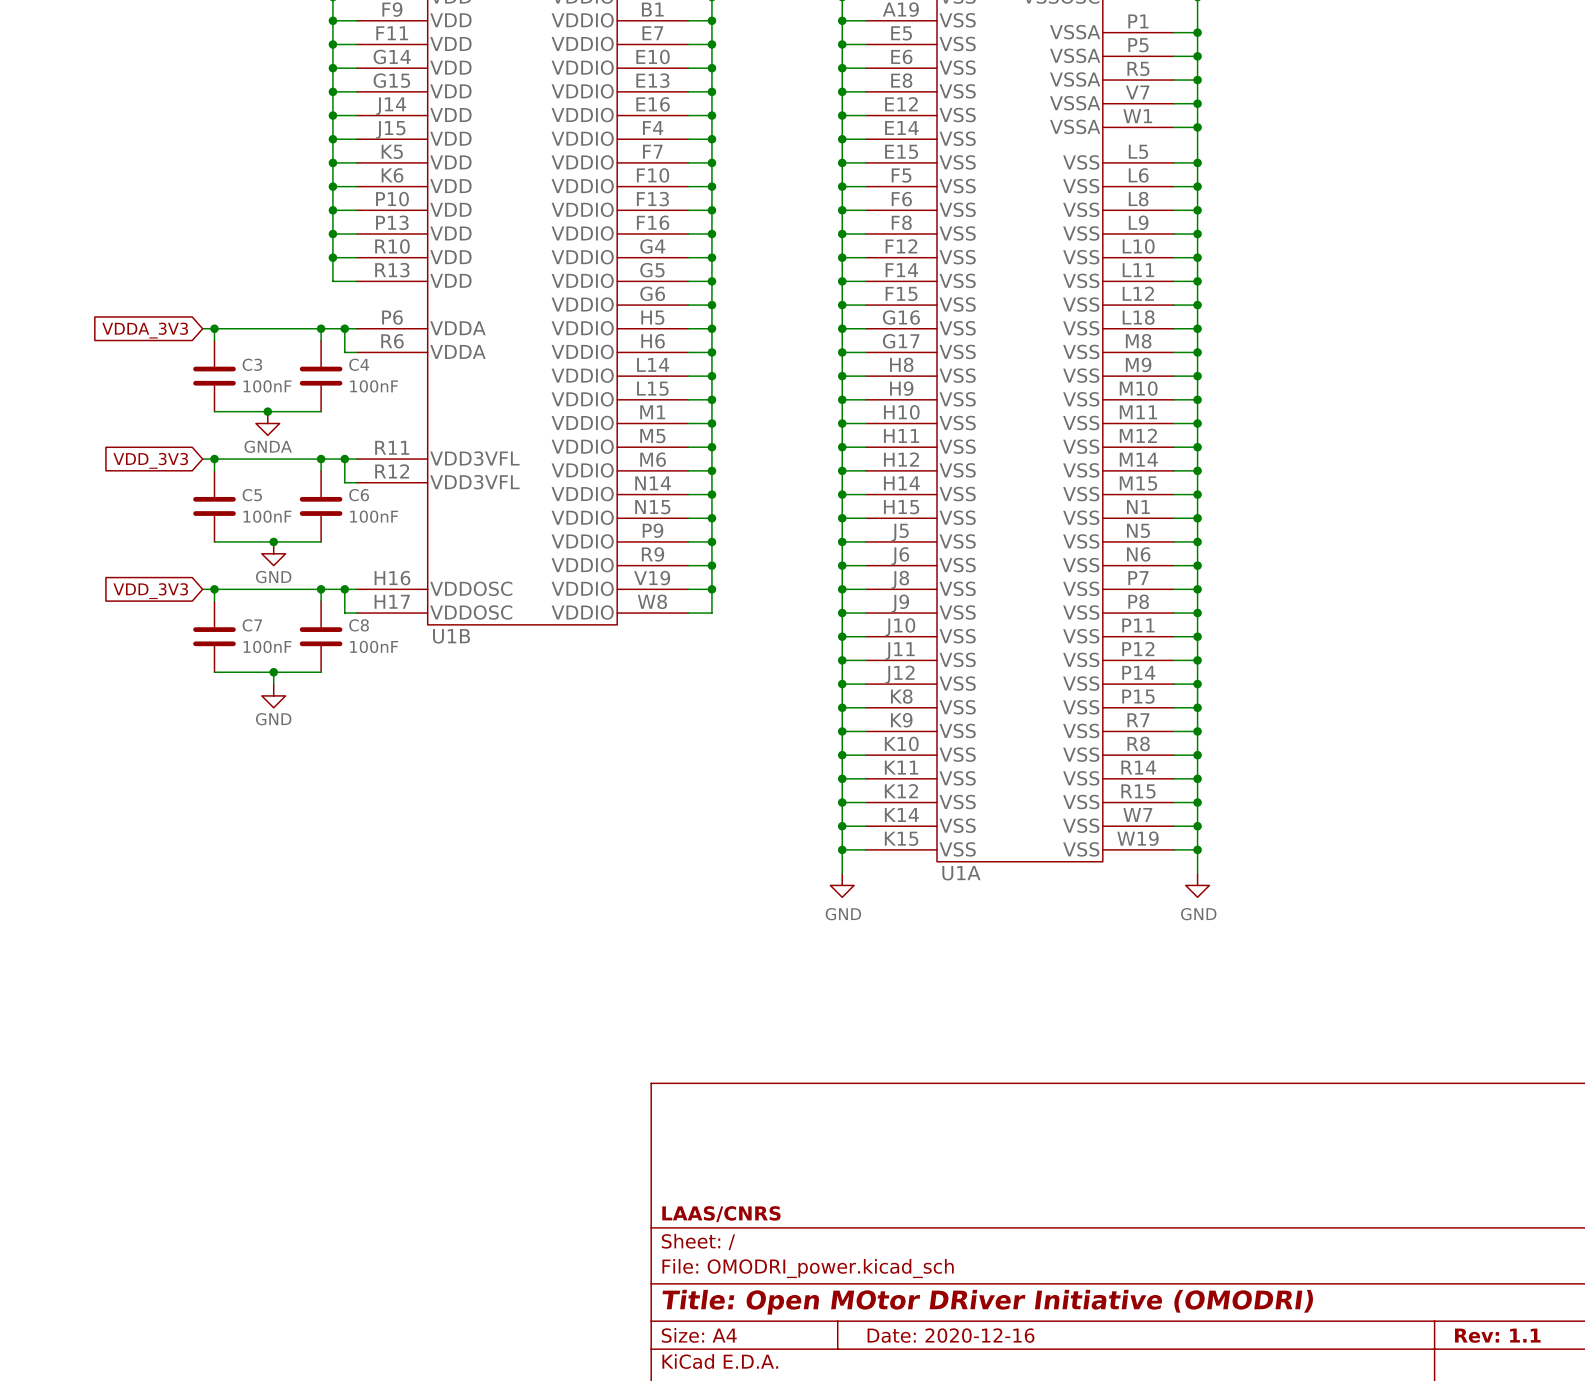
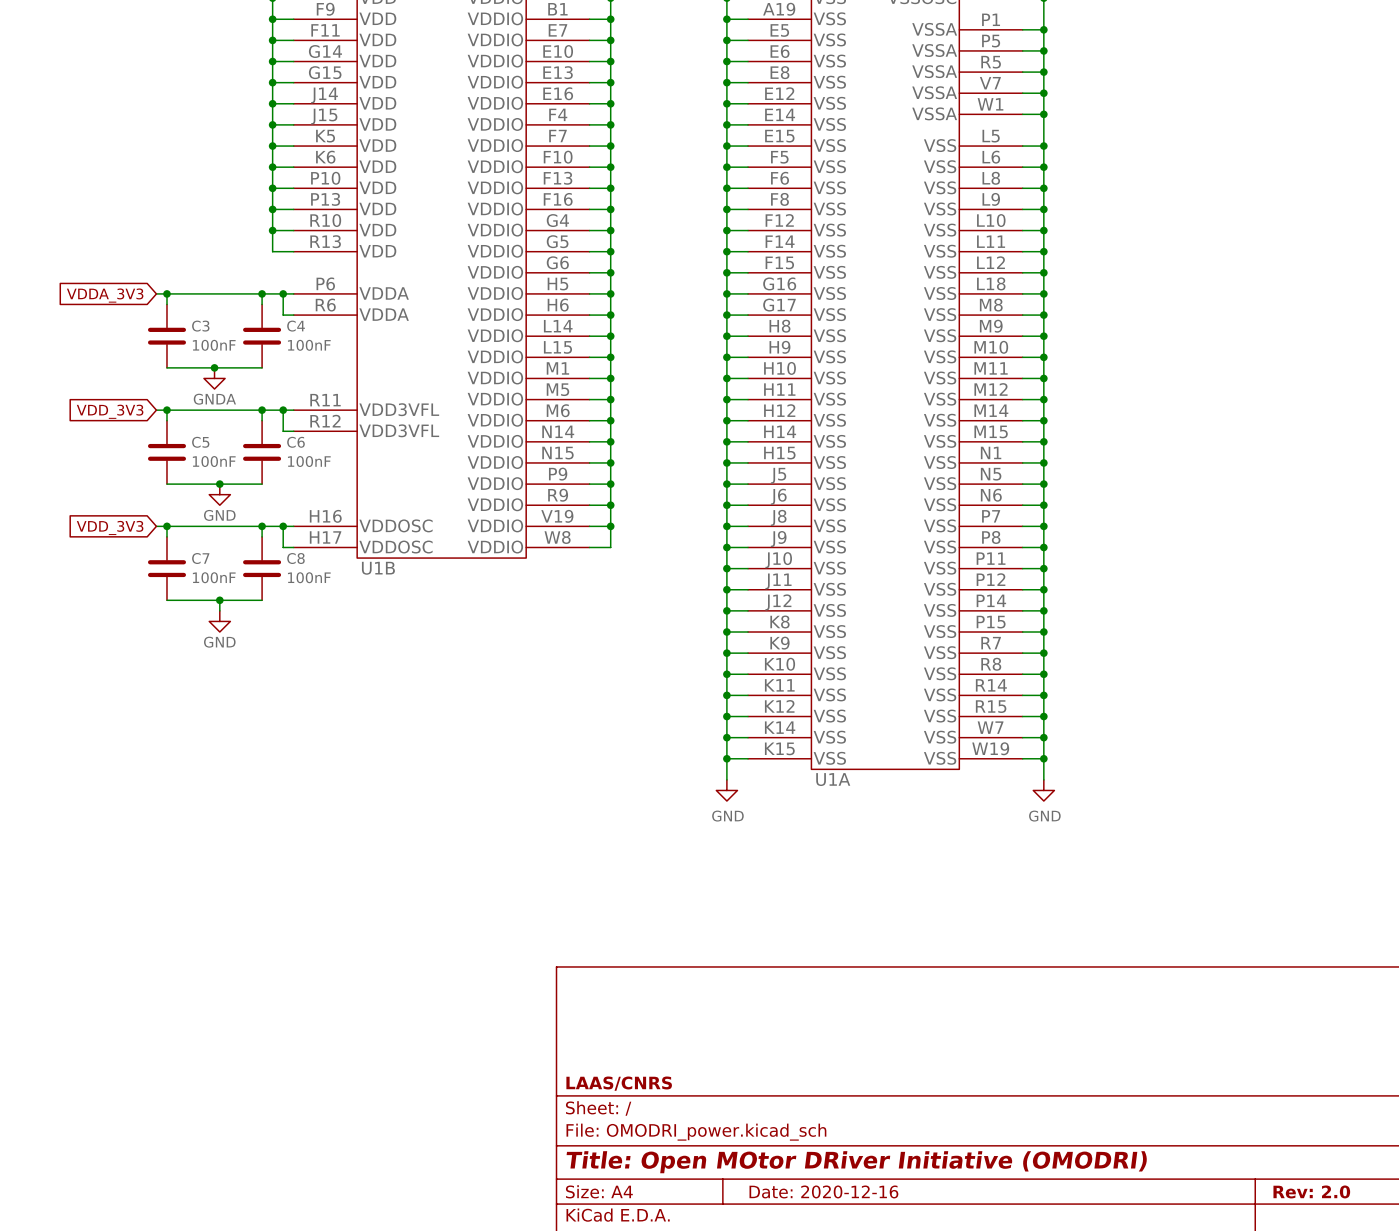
title block: Rev: 1.1 (1497, 1335) -> Rev: 2.0 (1311, 1191)

